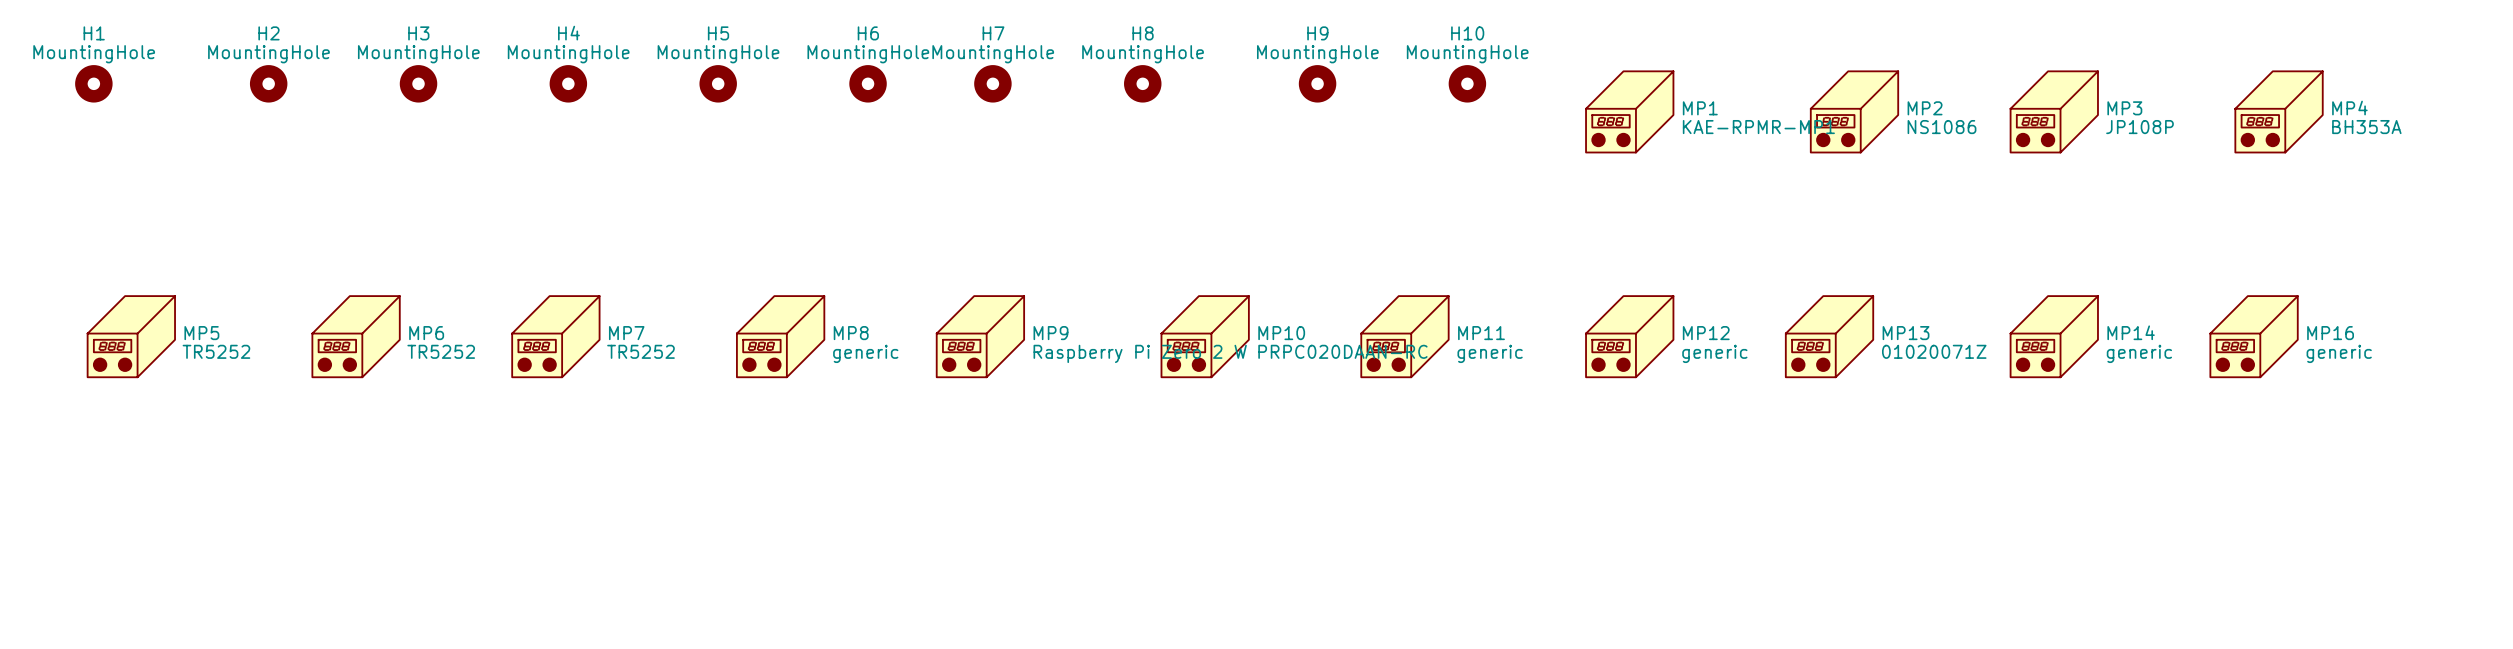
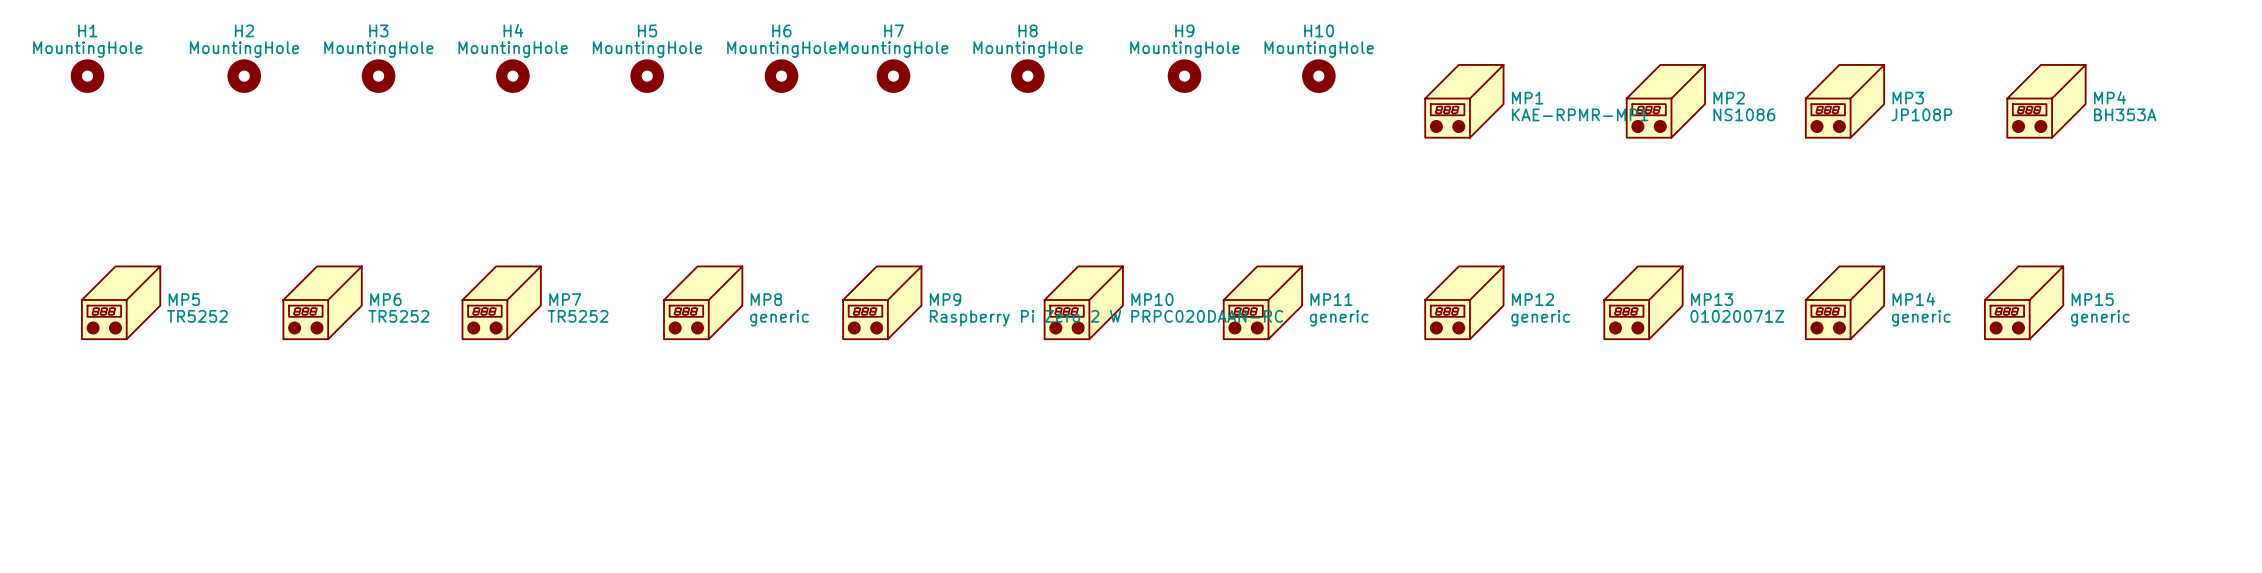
MP16 name: MP16 (2330, 333) -> MP15 (2092, 299)

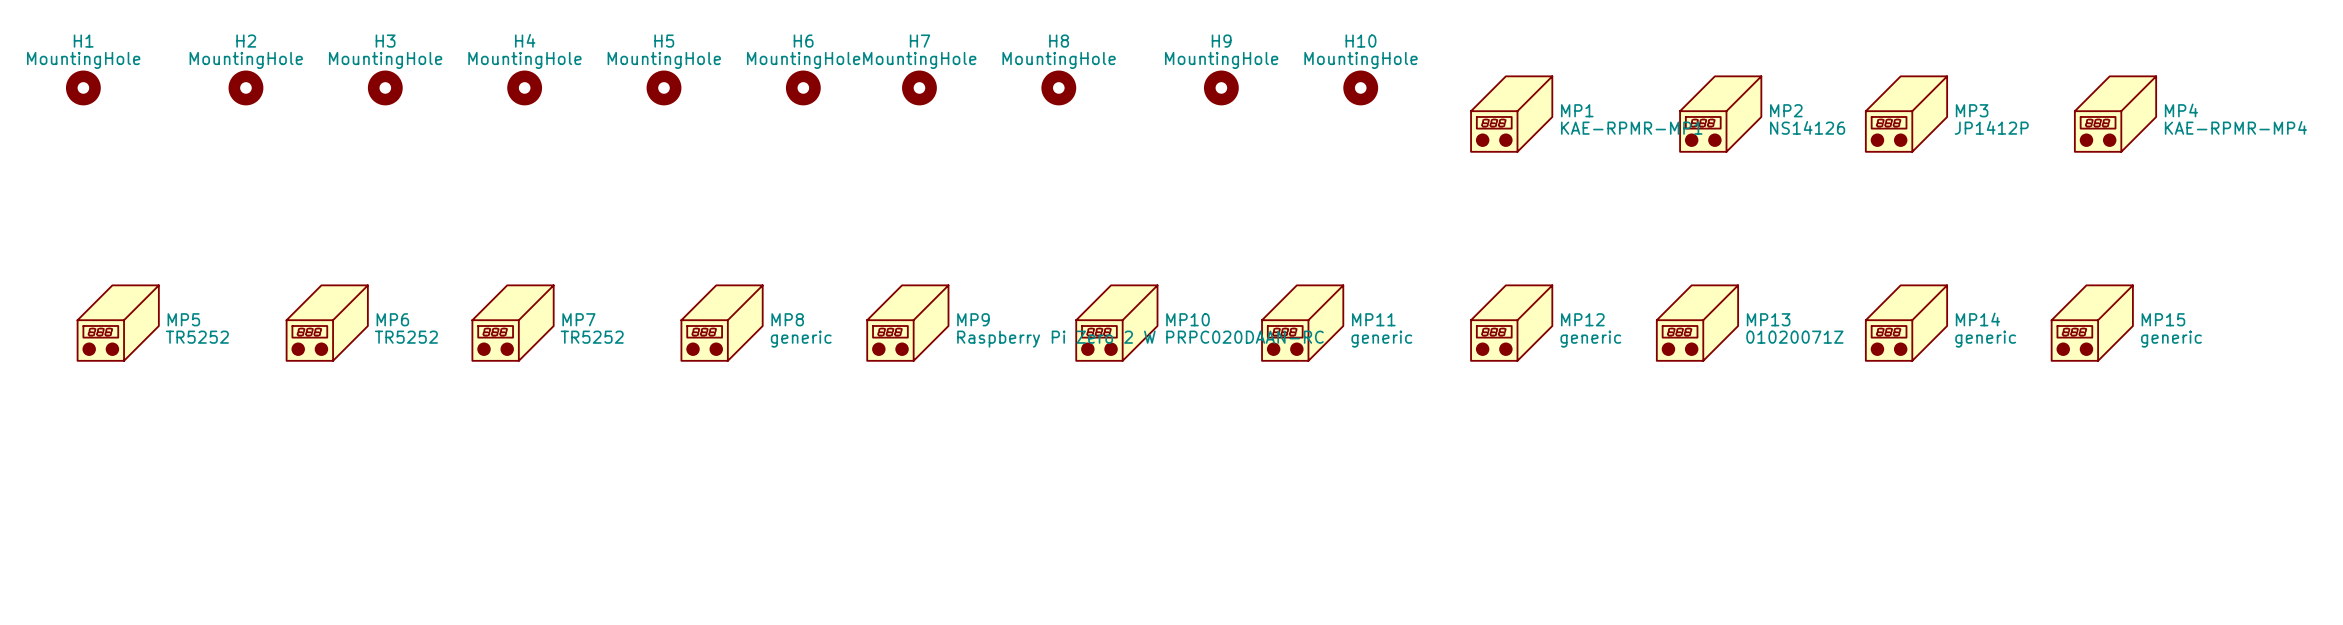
MP2 value: NS1086 (1744, 114) -> NS14126 (1807, 127)
MP3 value: JP108P (1921, 114) -> JP1412P (1991, 127)
MP4 value: BH353A (2125, 114) -> KAE-RPMR-MP4 (2235, 127)

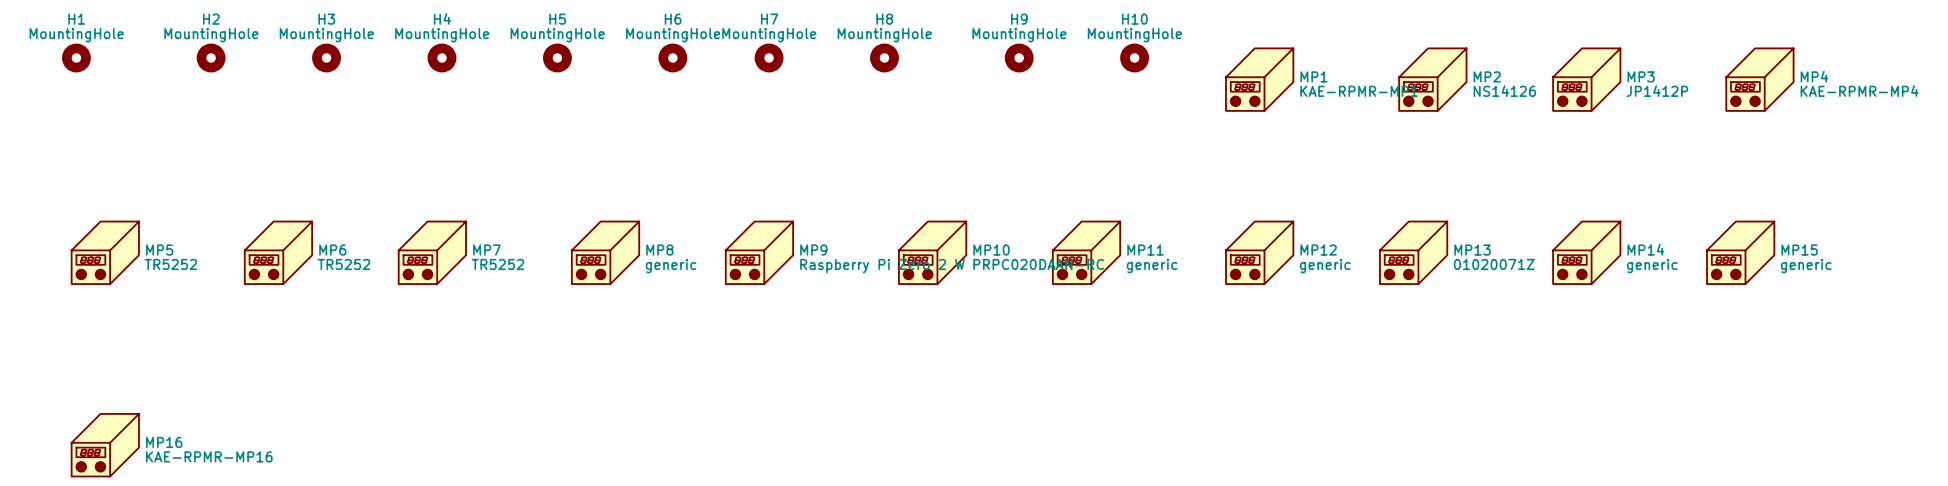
MP16: none -> KAE-RPMR-MP16 (105, 445)

